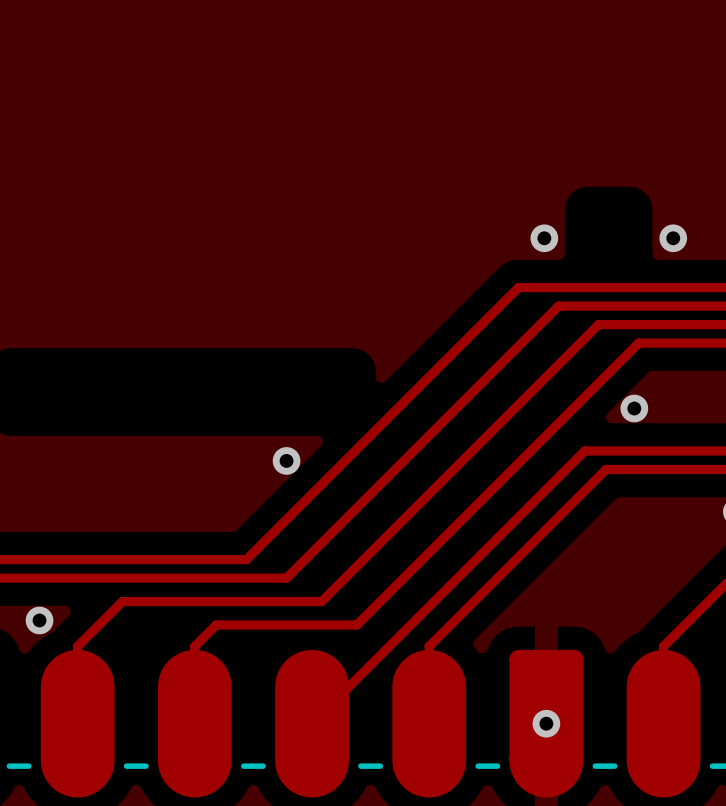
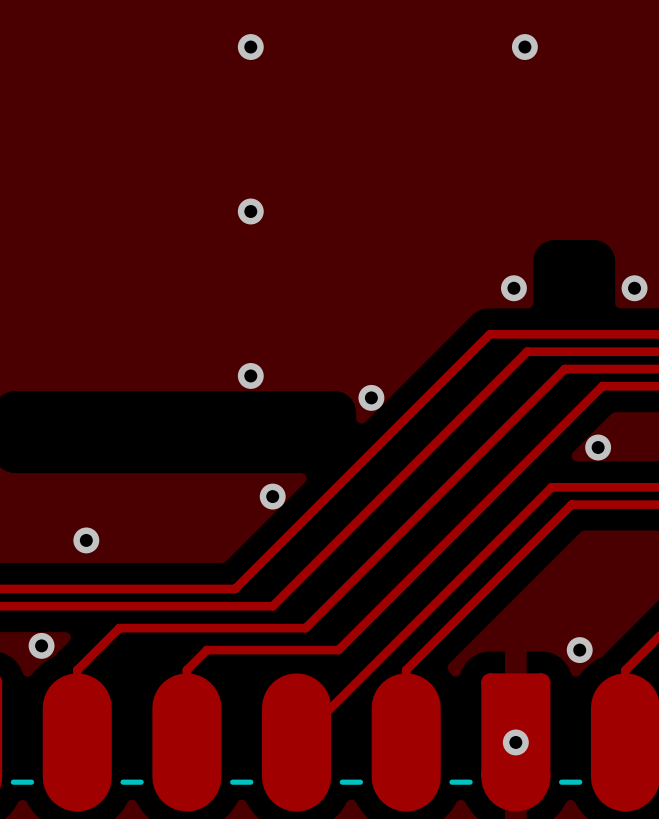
via: none -> (250, 211)
via: none -> (250, 375)
via: none -> (371, 397)
via: none -> (86, 540)
via: none -> (579, 650)

